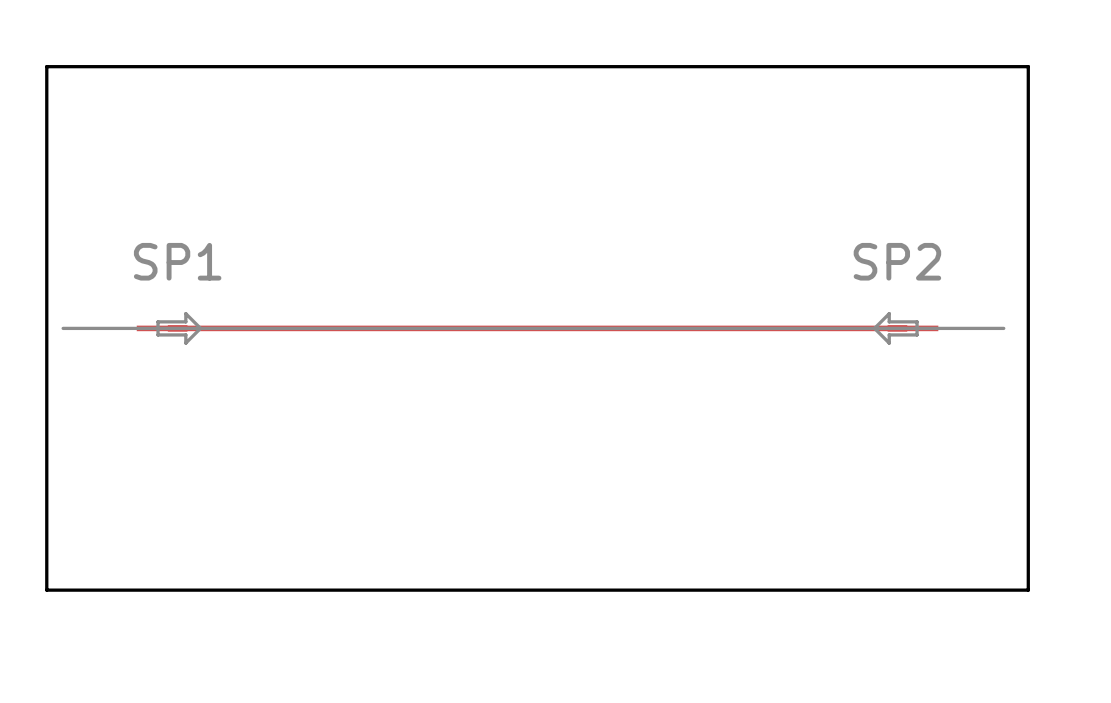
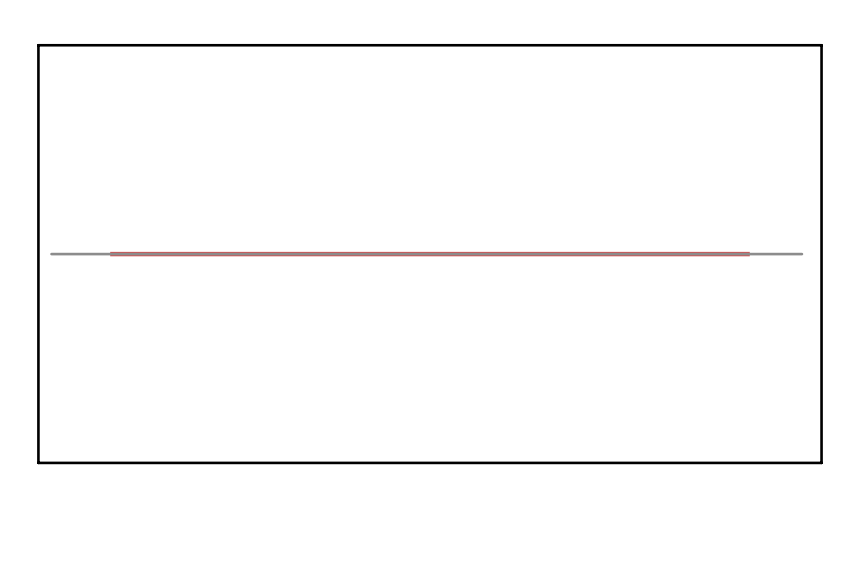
SP1: (179, 328) -> none
SP2: (895, 328) -> none

